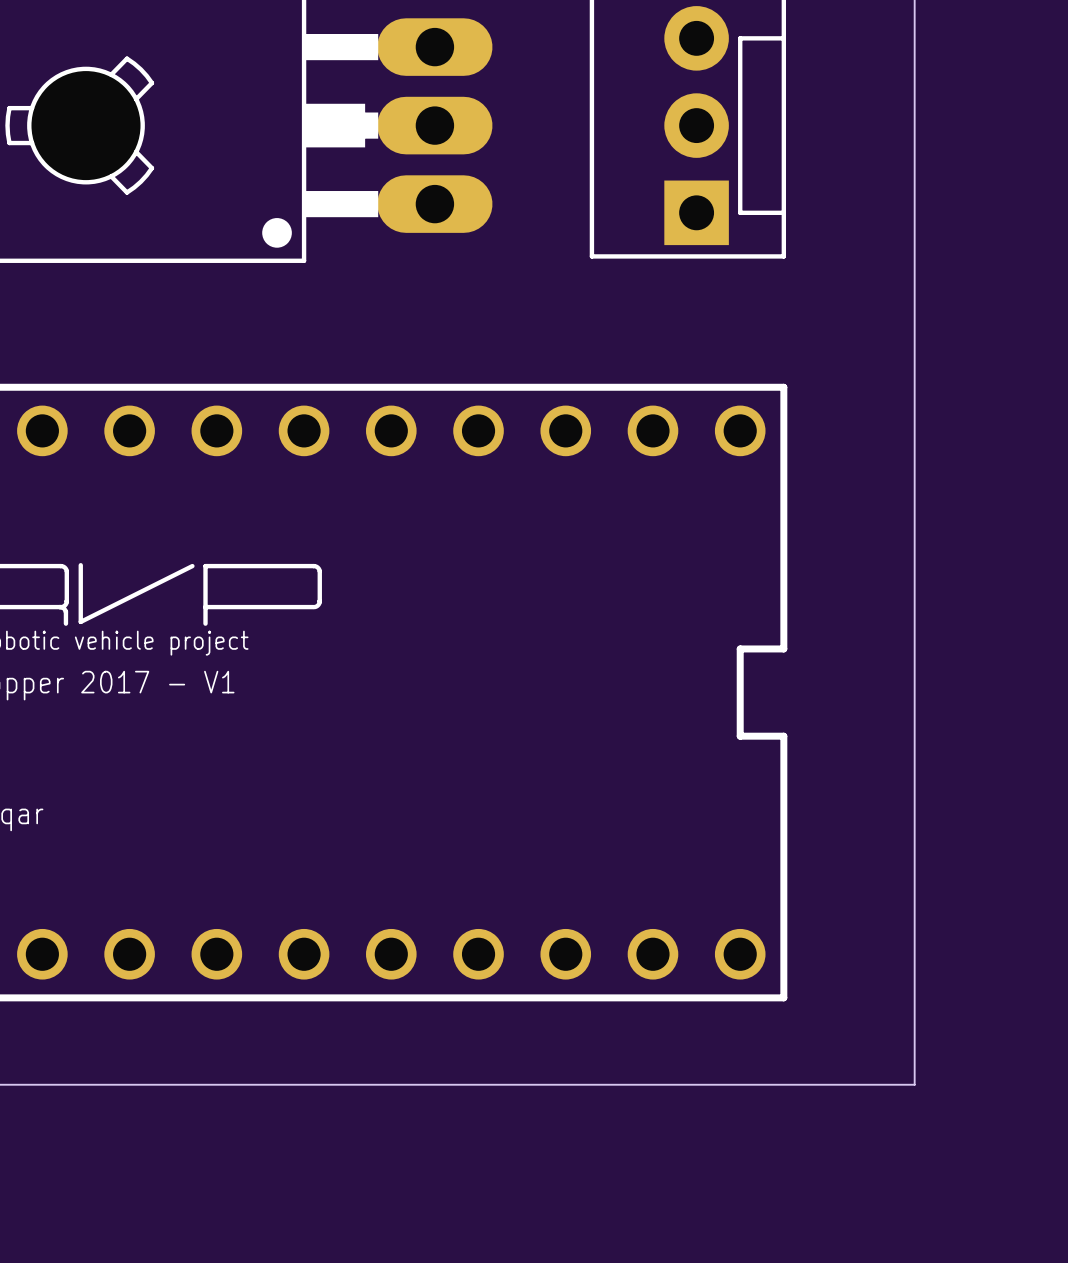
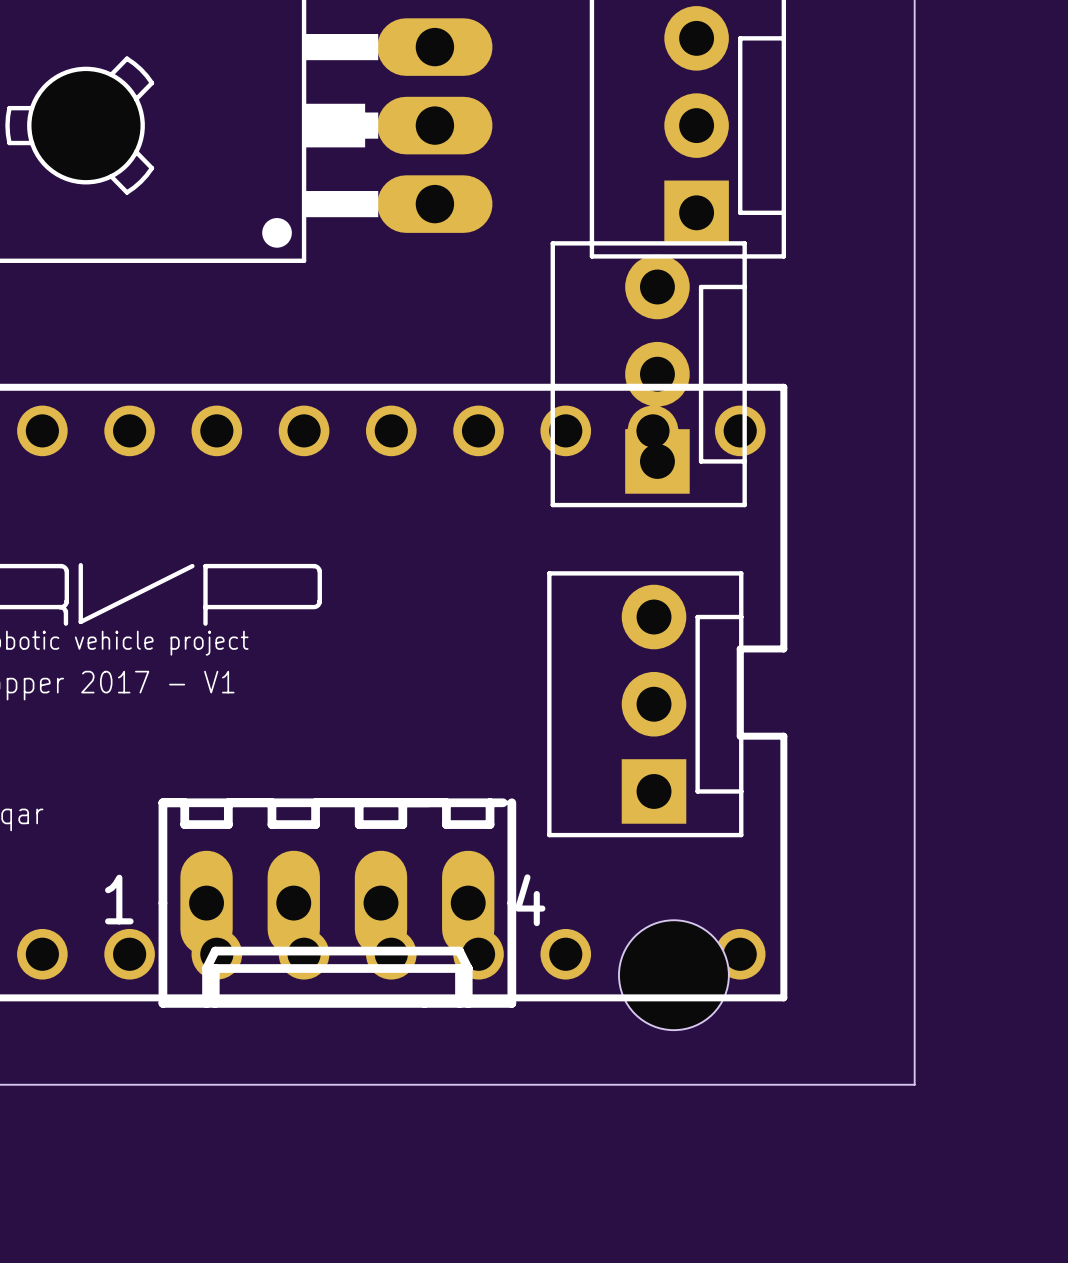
part: none -> (648, 374)
part: none -> (645, 704)
part: none -> (337, 903)
hole: none -> (673, 975)

